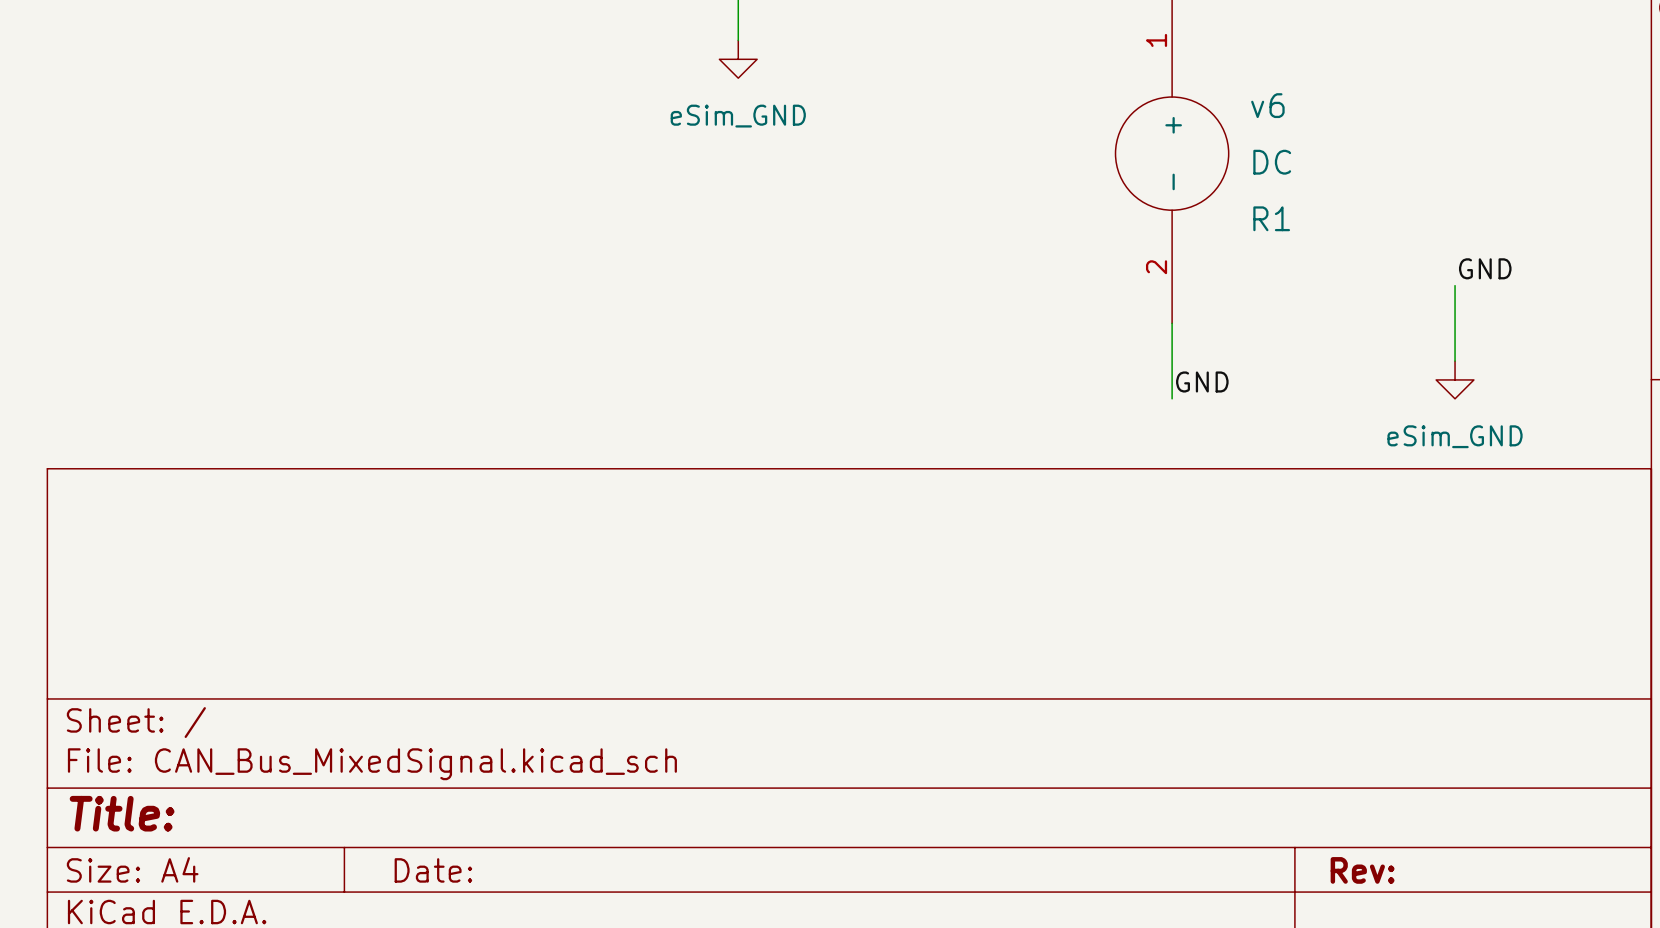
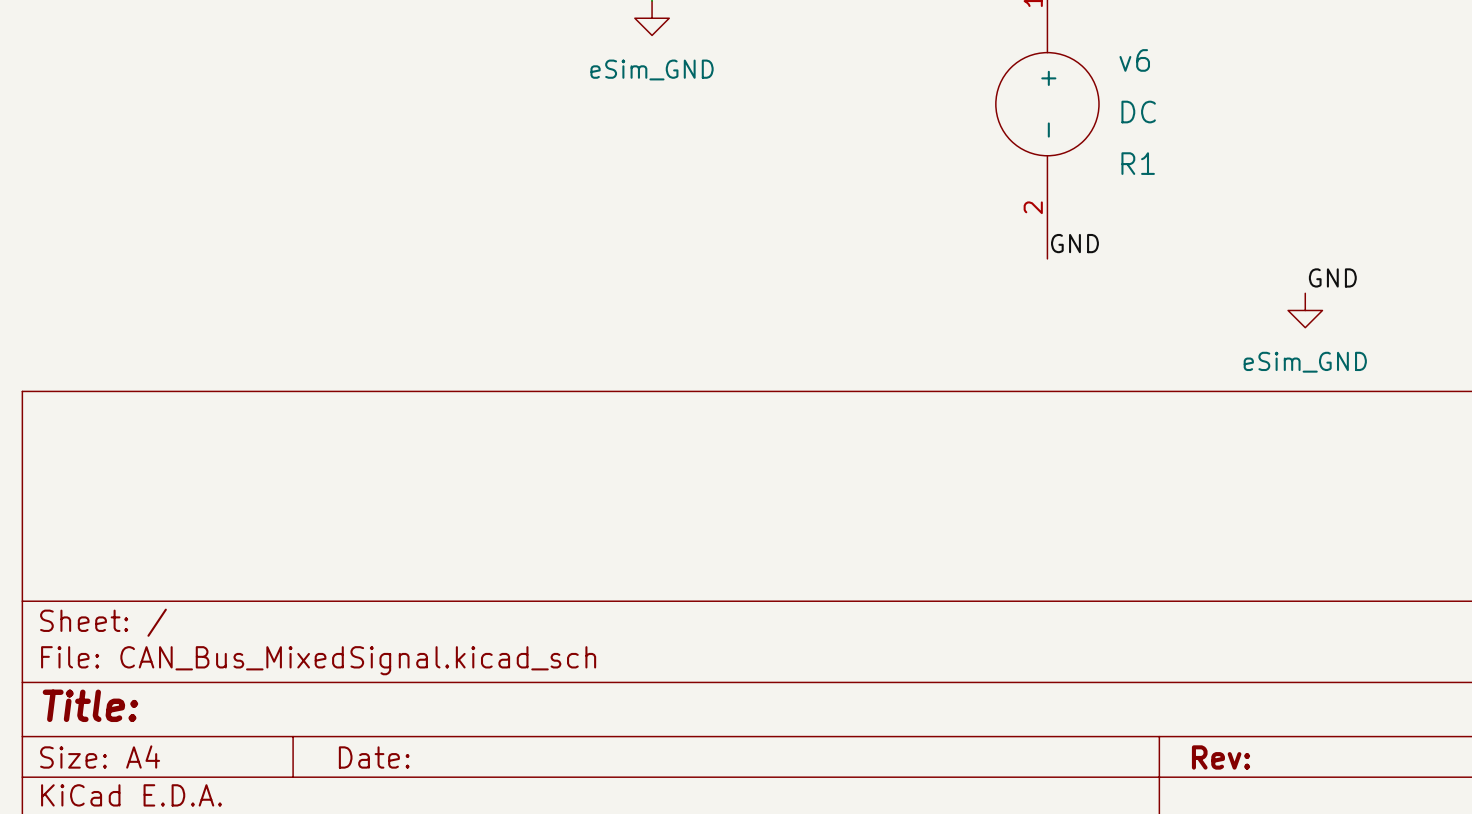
label position: GND (1485, 268) -> GND (1332, 277)
wire: (1455, 285) (1455, 361) -> none
wire: (1172, 323) (1172, 398) -> none
label position: GND (1202, 381) -> GND (1074, 243)

